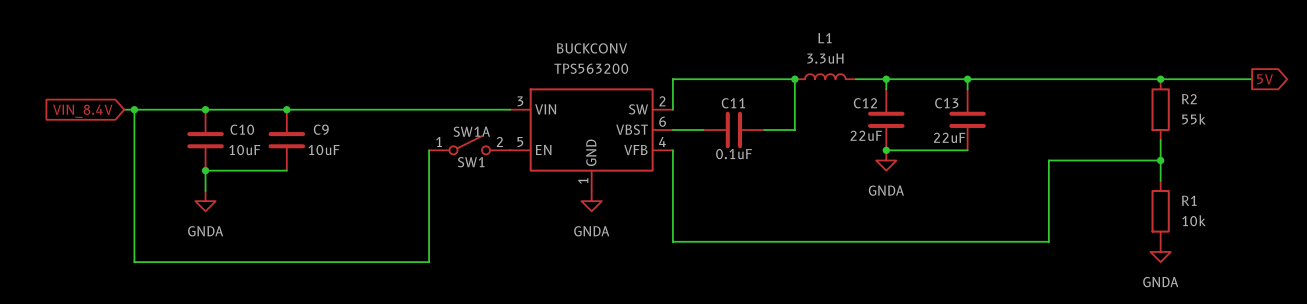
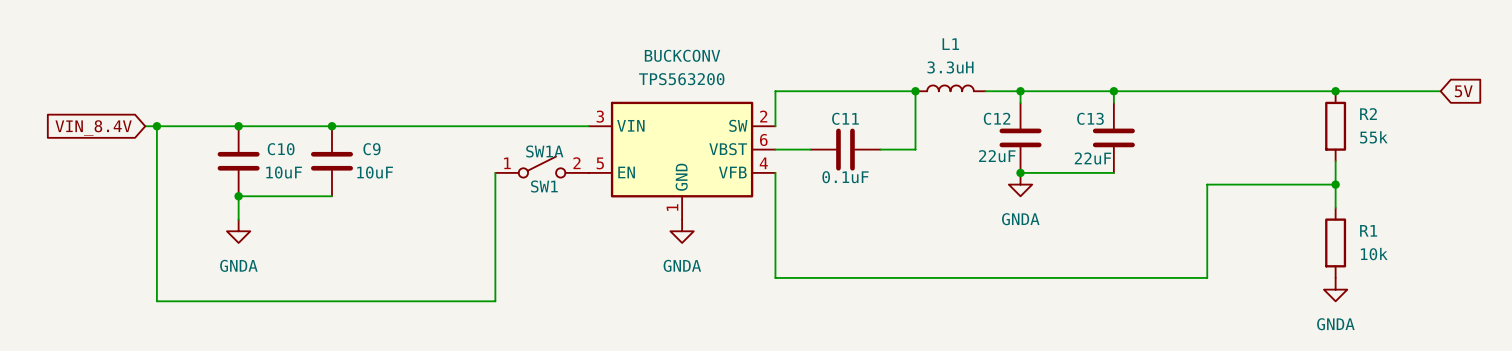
global label shape: output (1265, 79) -> input (1463, 91)

